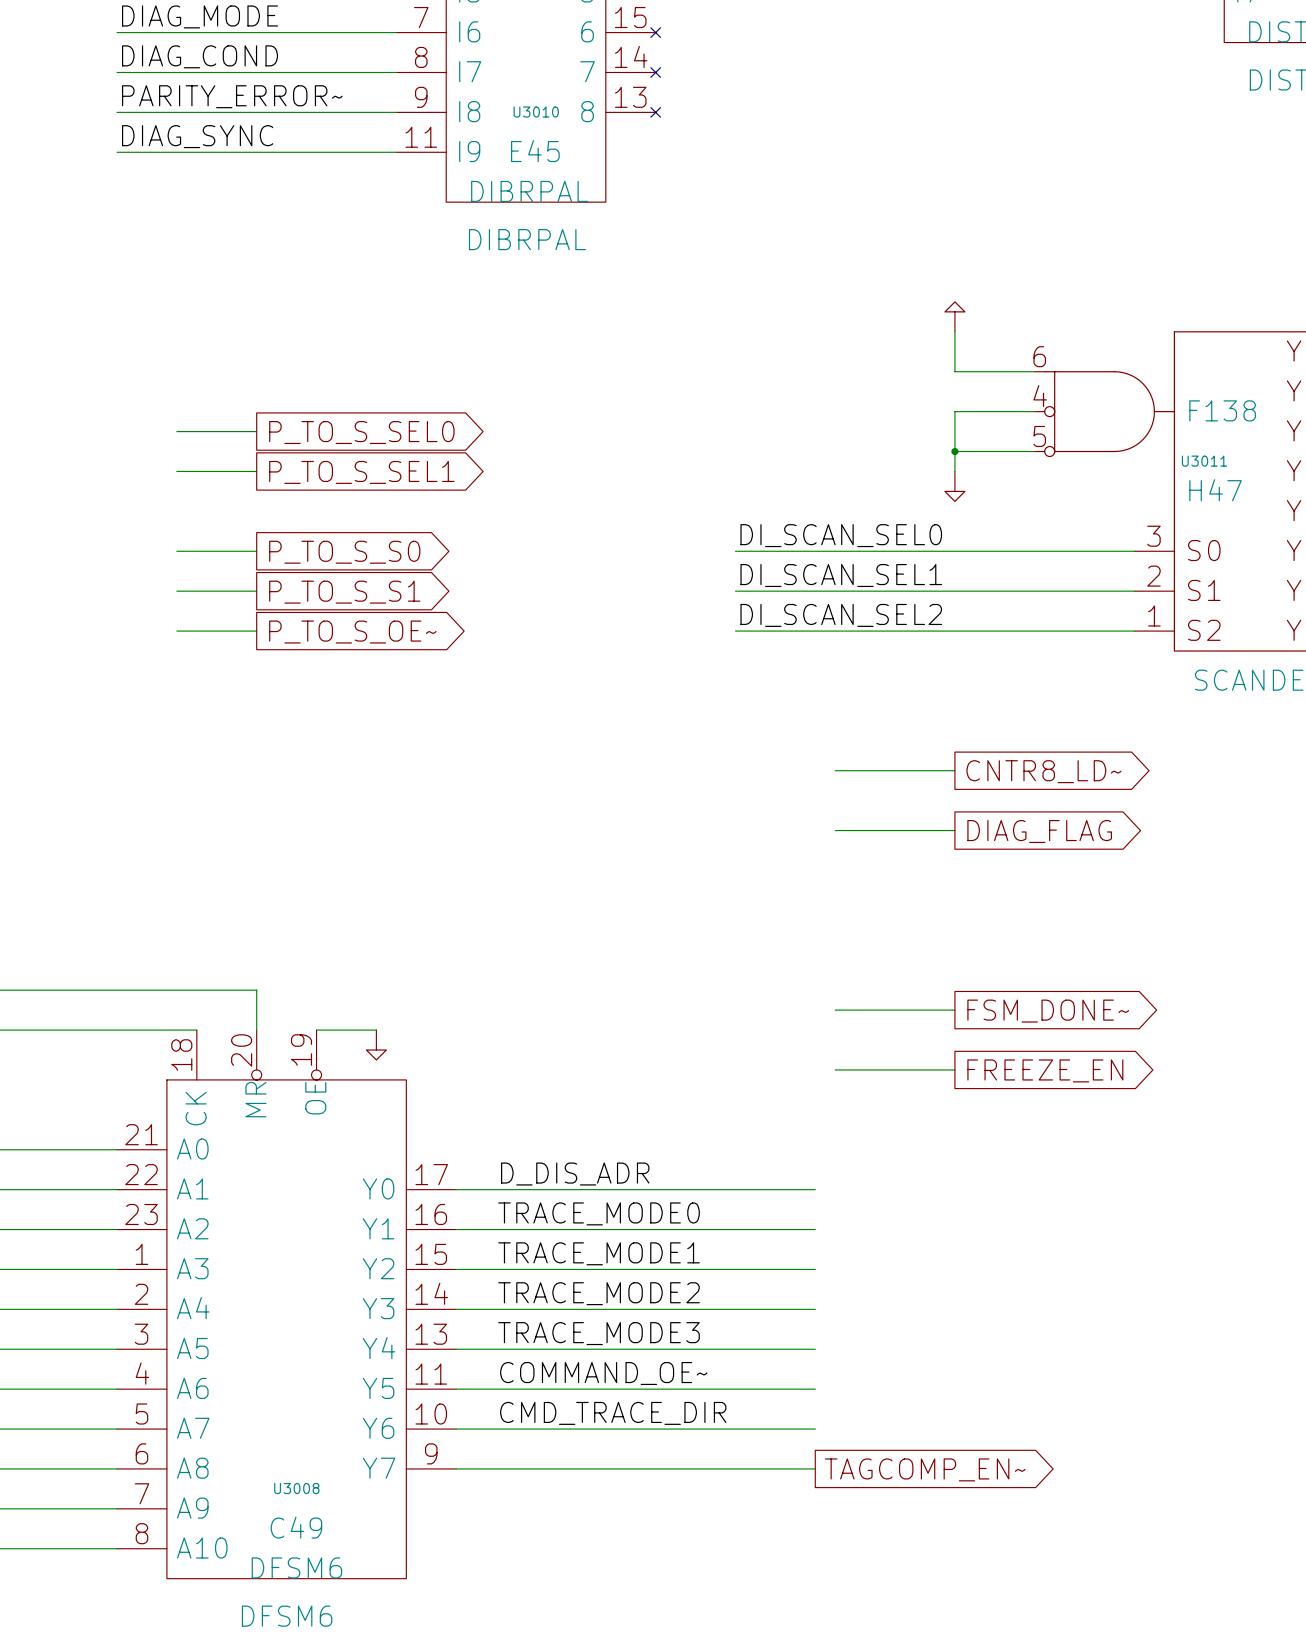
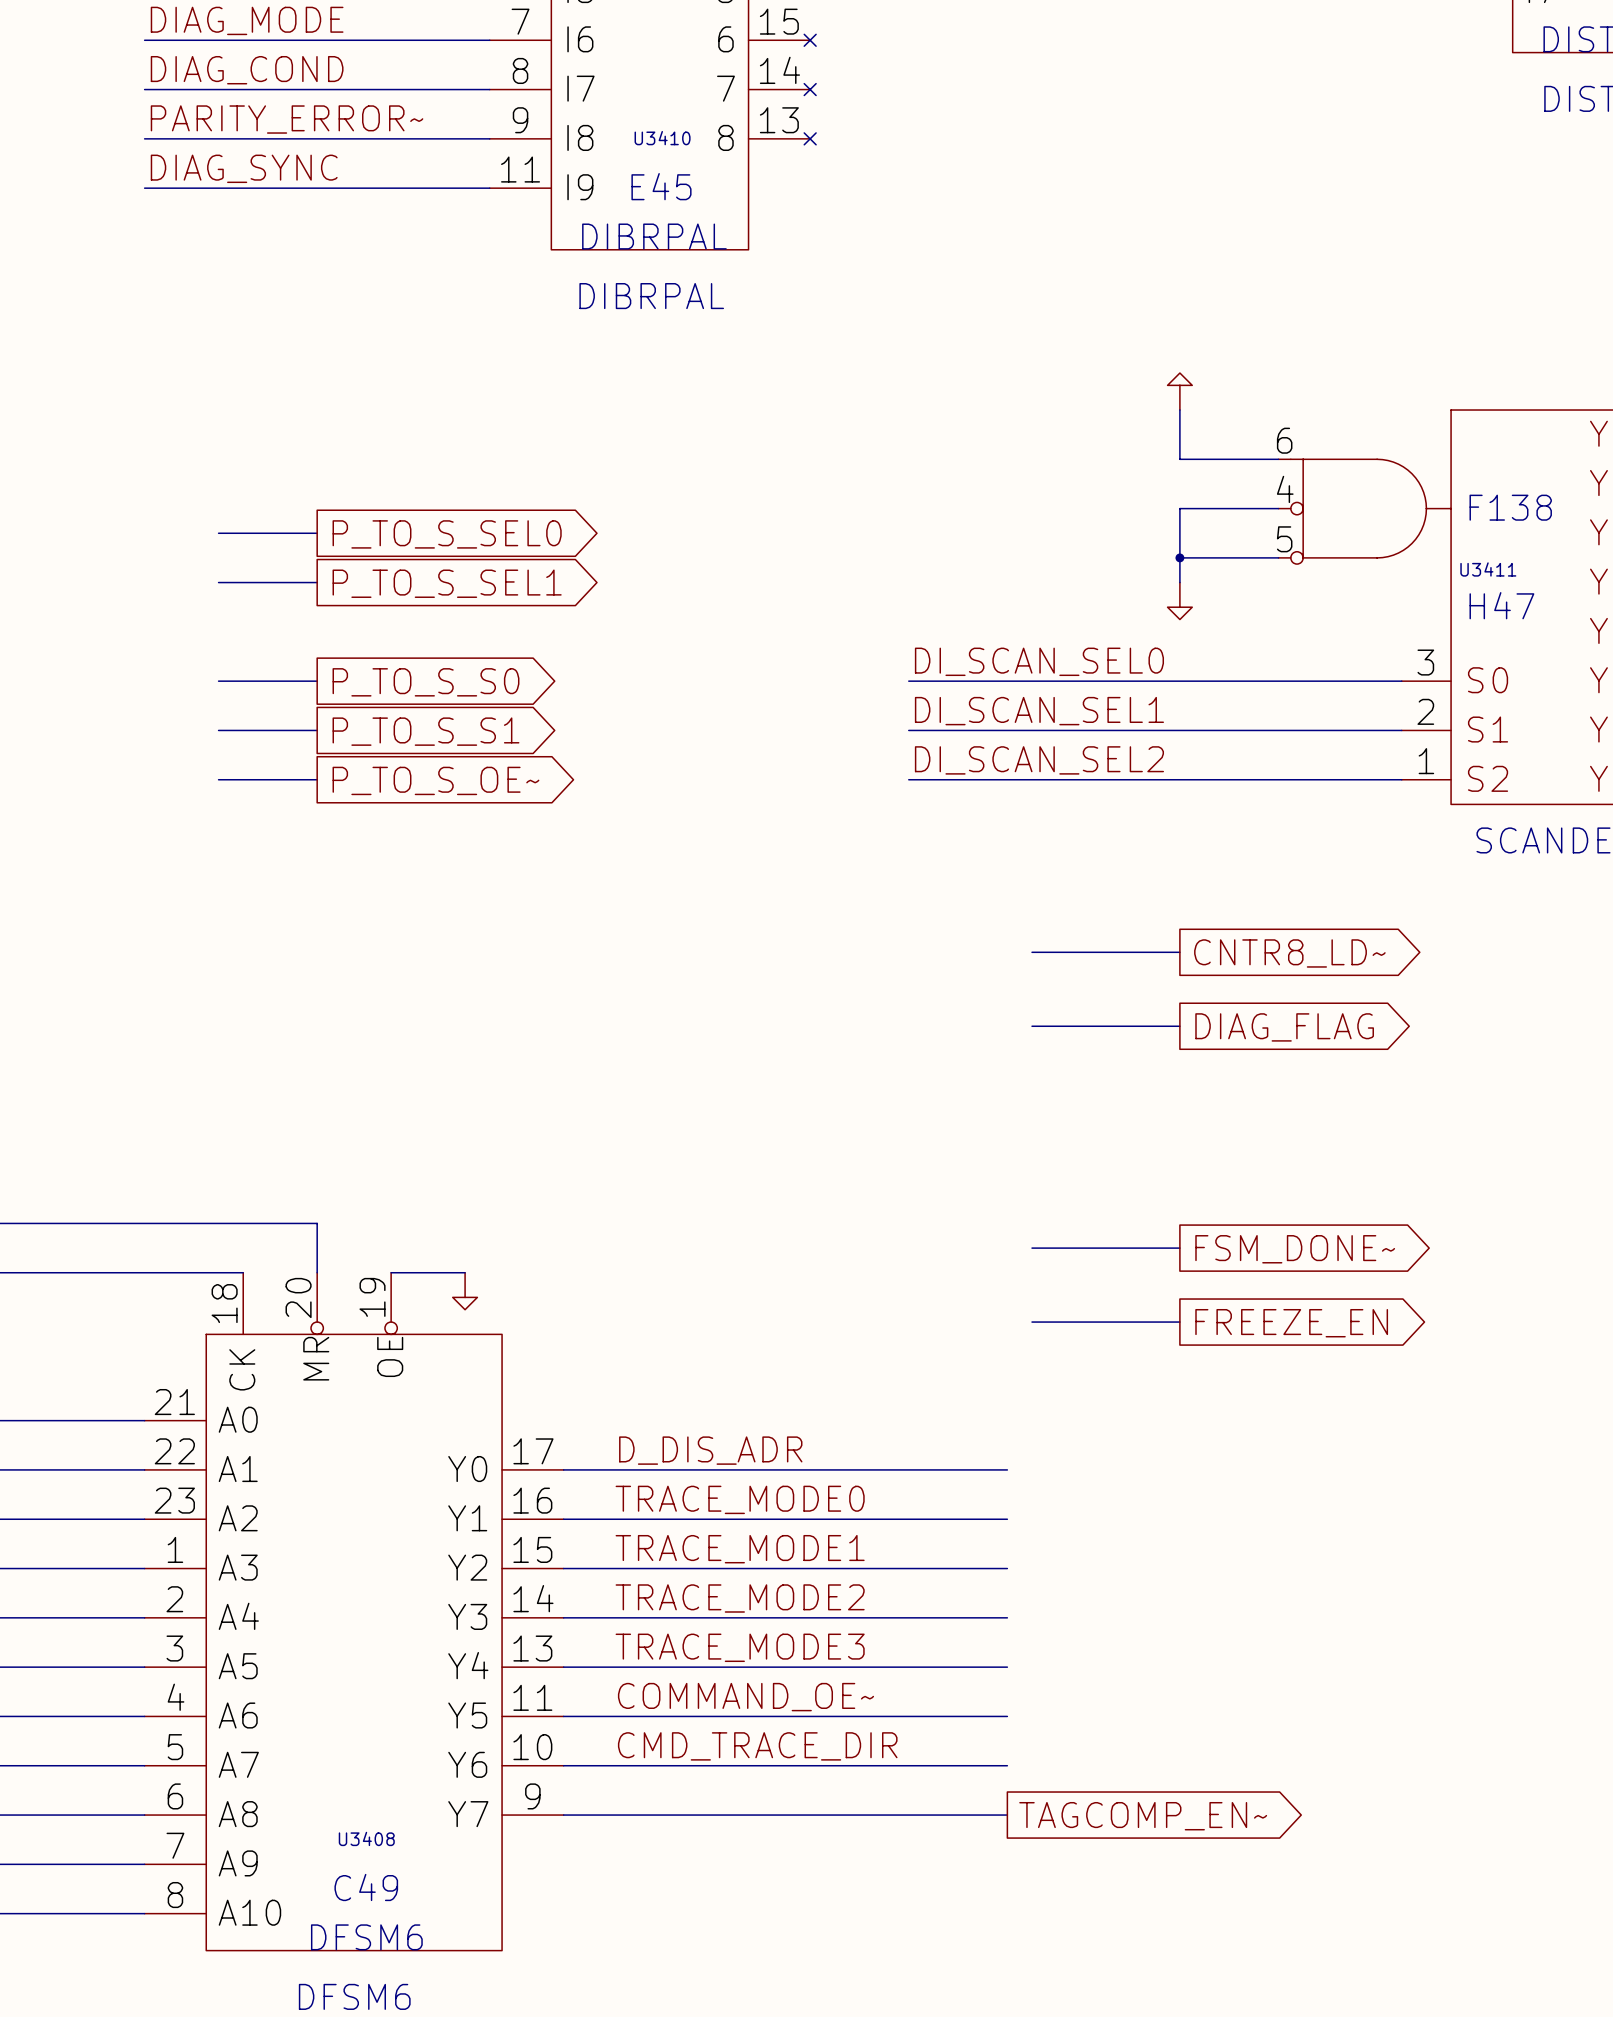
U3010 name: U3010 (536, 112) -> U3410 (662, 138)
U3011 name: U3011 (1204, 461) -> U3411 (1488, 569)
U3008 name: U3008 (296, 1488) -> U3408 (366, 1838)

